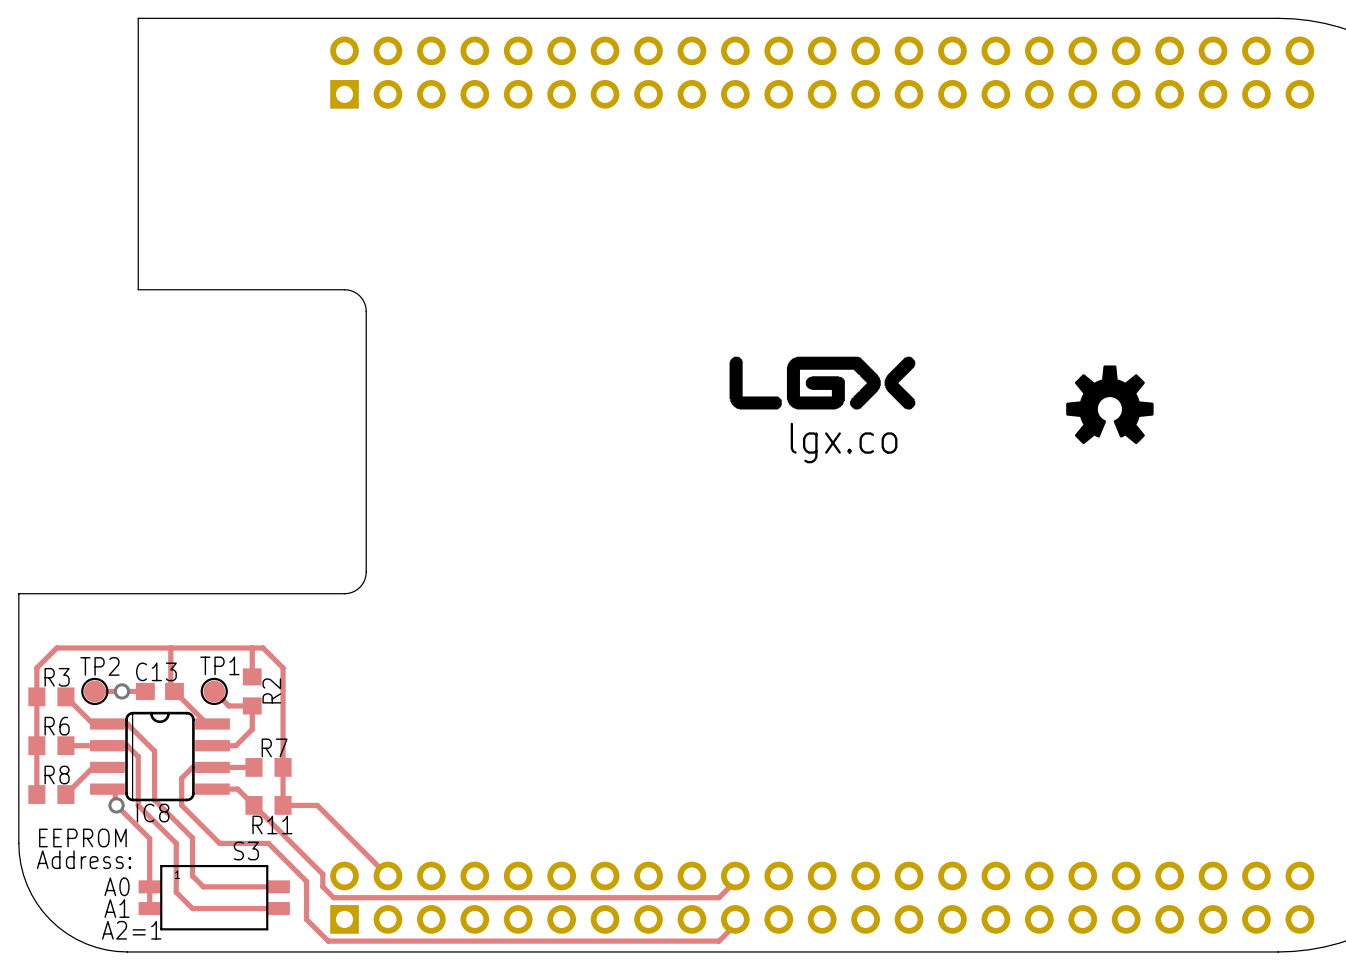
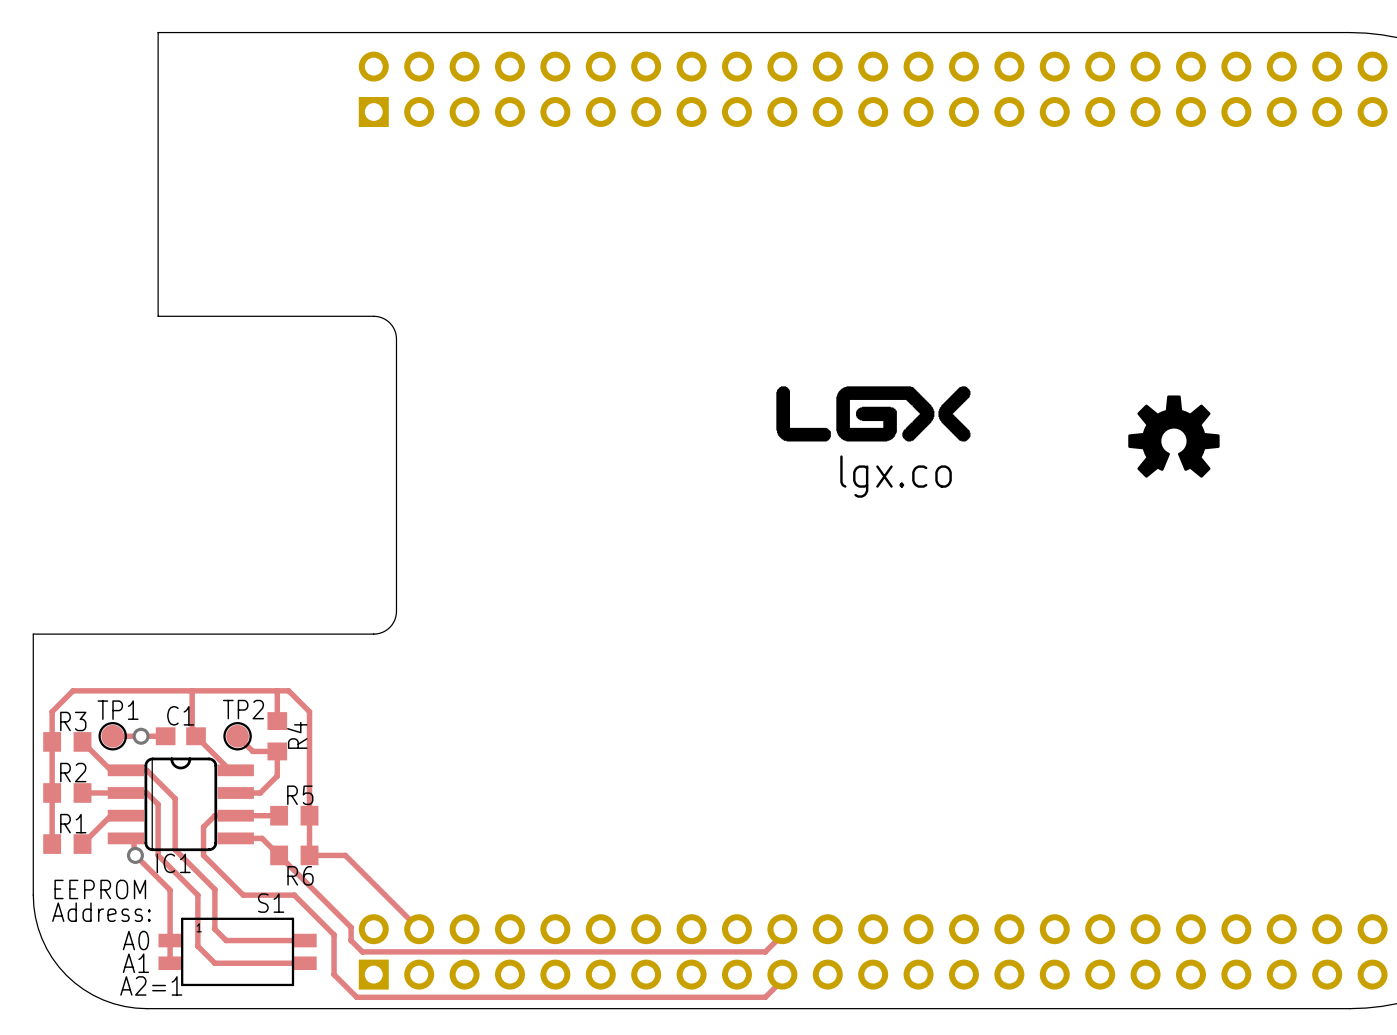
TP1 name: TP1 (219, 665) -> TP2 (243, 709)
TP2 name: TP2 (99, 666) -> TP1 (118, 710)
C13 name: C13 (156, 671) -> C1 (180, 715)
R2 name: R2 (271, 690) -> R4 (297, 735)
R6 name: R6 (57, 726) -> R2 (73, 772)
R7 name: R7 (274, 747) -> R5 (300, 795)
R8 name: R8 (57, 775) -> R1 (73, 823)
IC8 name: IC8 (153, 813) -> IC1 (173, 863)
R11 name: R11 (272, 824) -> R6 (300, 875)
S3 name: S3 (246, 851) -> S1 (271, 903)

